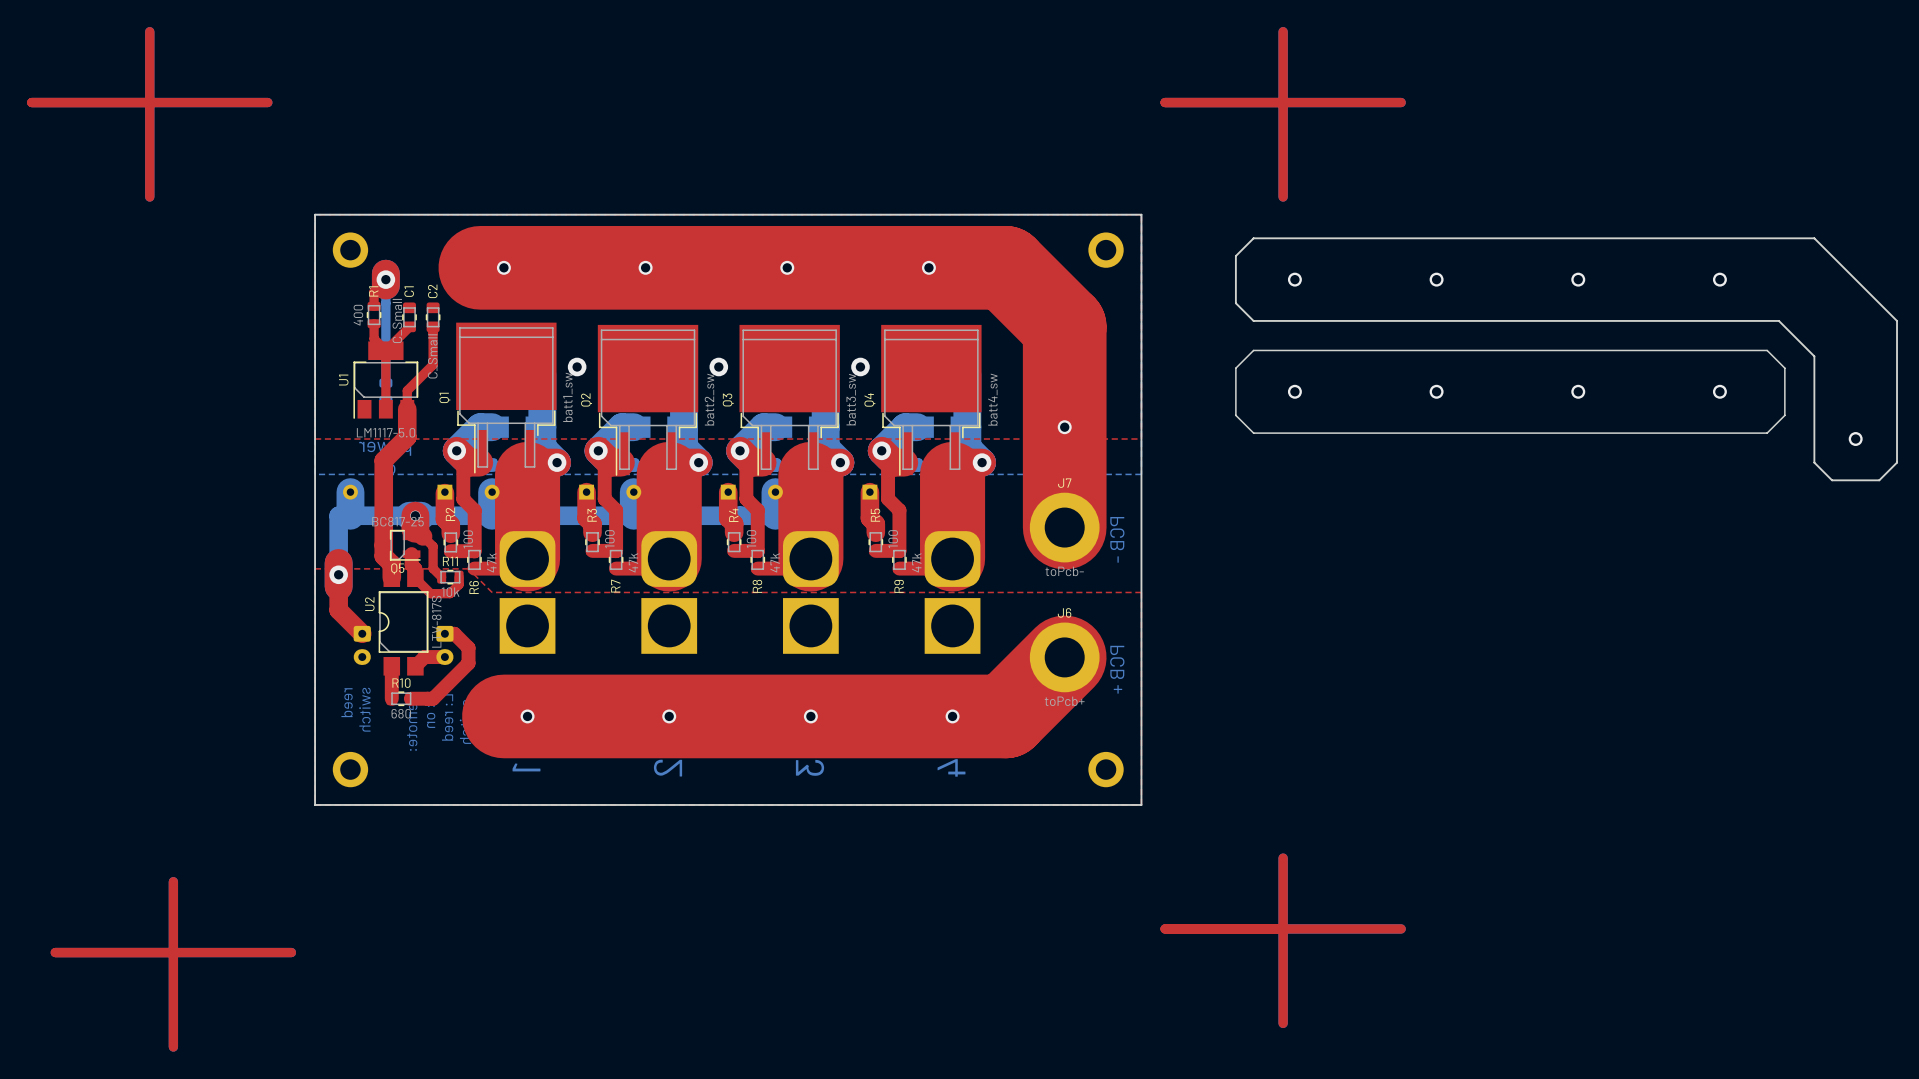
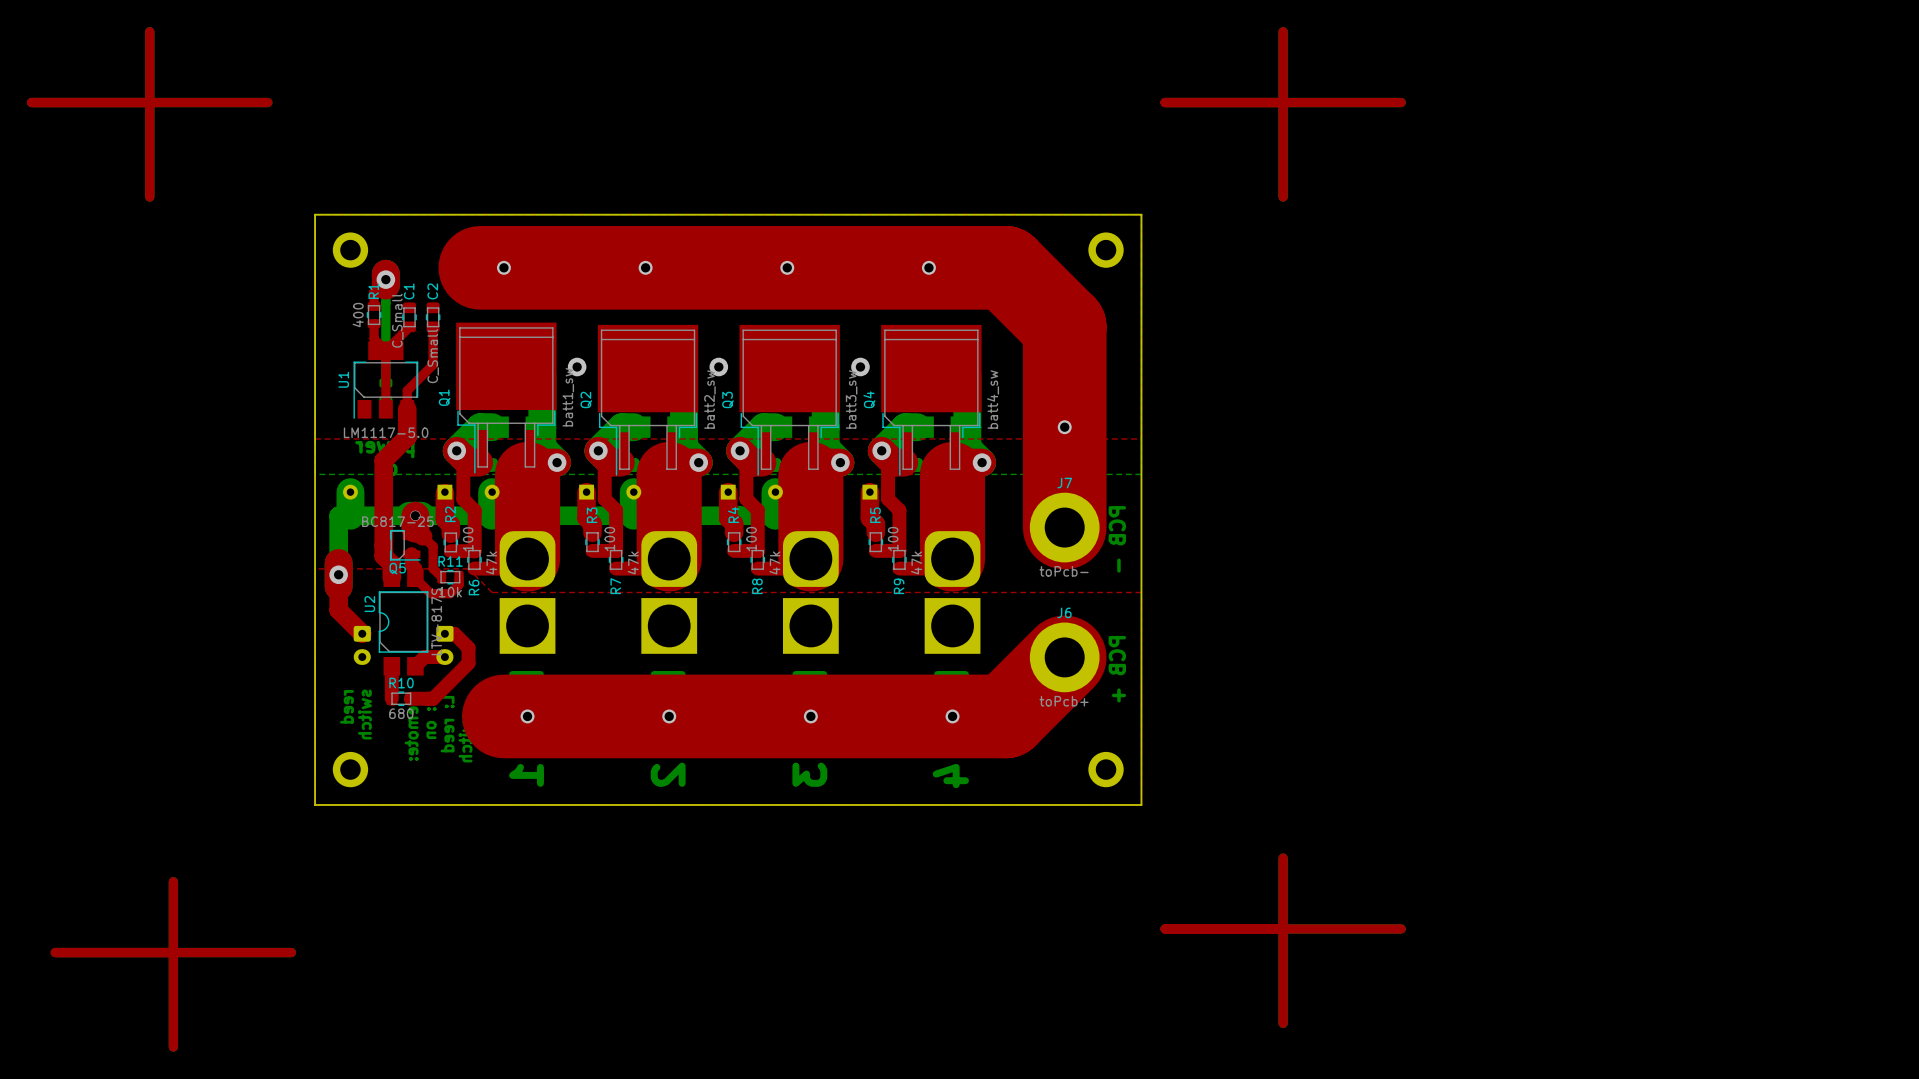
board edge: (1253, 238) (1235, 256) (1235, 303) (1253, 320) (1778, 320) (1814, 356) (1814, 462) (1832, 480) (1879, 480) (1897, 462) (1897, 320) (1814, 238) (1253, 238) -> none
via: (1294, 279) -> none
via: (1436, 279) -> none
via: (1578, 279) -> none
via: (1719, 279) -> none
board edge: (1253, 350) (1235, 368) (1235, 415) (1253, 433) (1767, 433) (1784, 415) (1784, 368) (1767, 350) (1253, 350) -> none
via: (1294, 391) -> none
via: (1436, 391) -> none
via: (1578, 391) -> none
via: (1719, 391) -> none
via: (1855, 439) -> none

